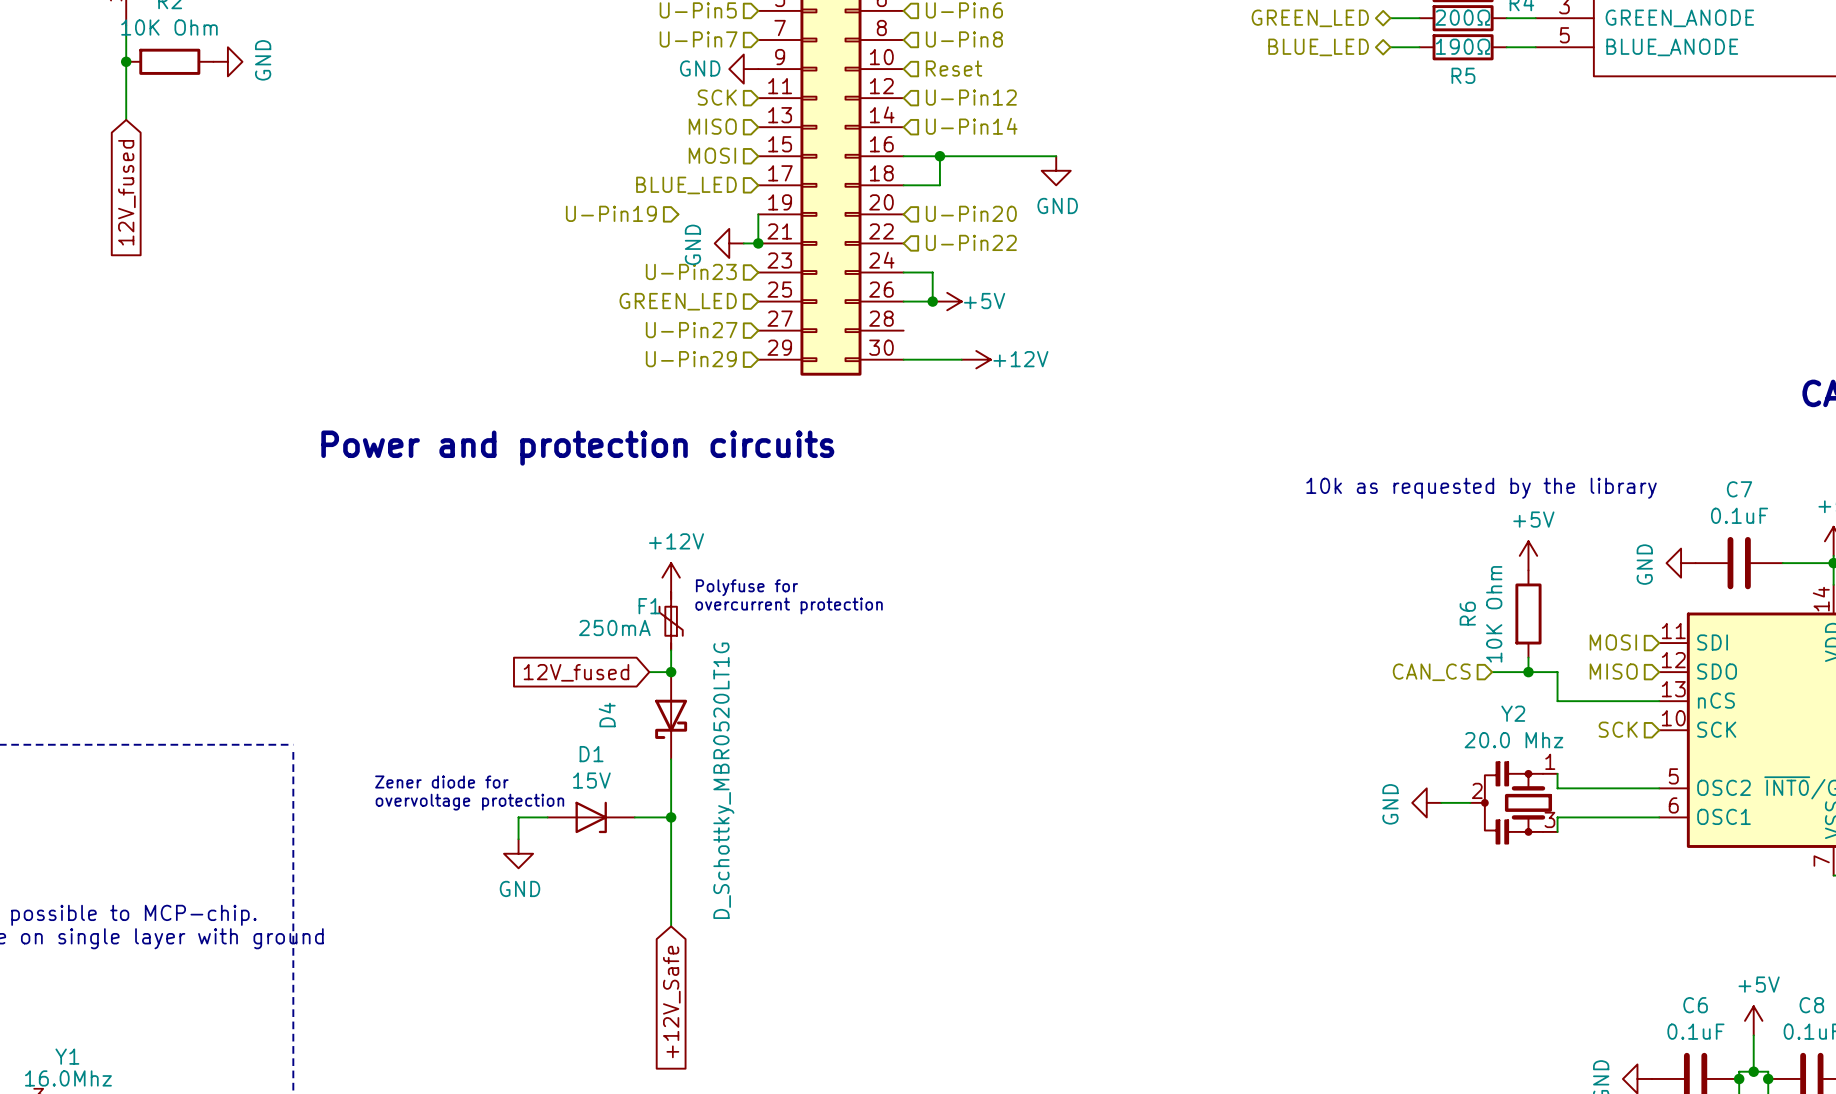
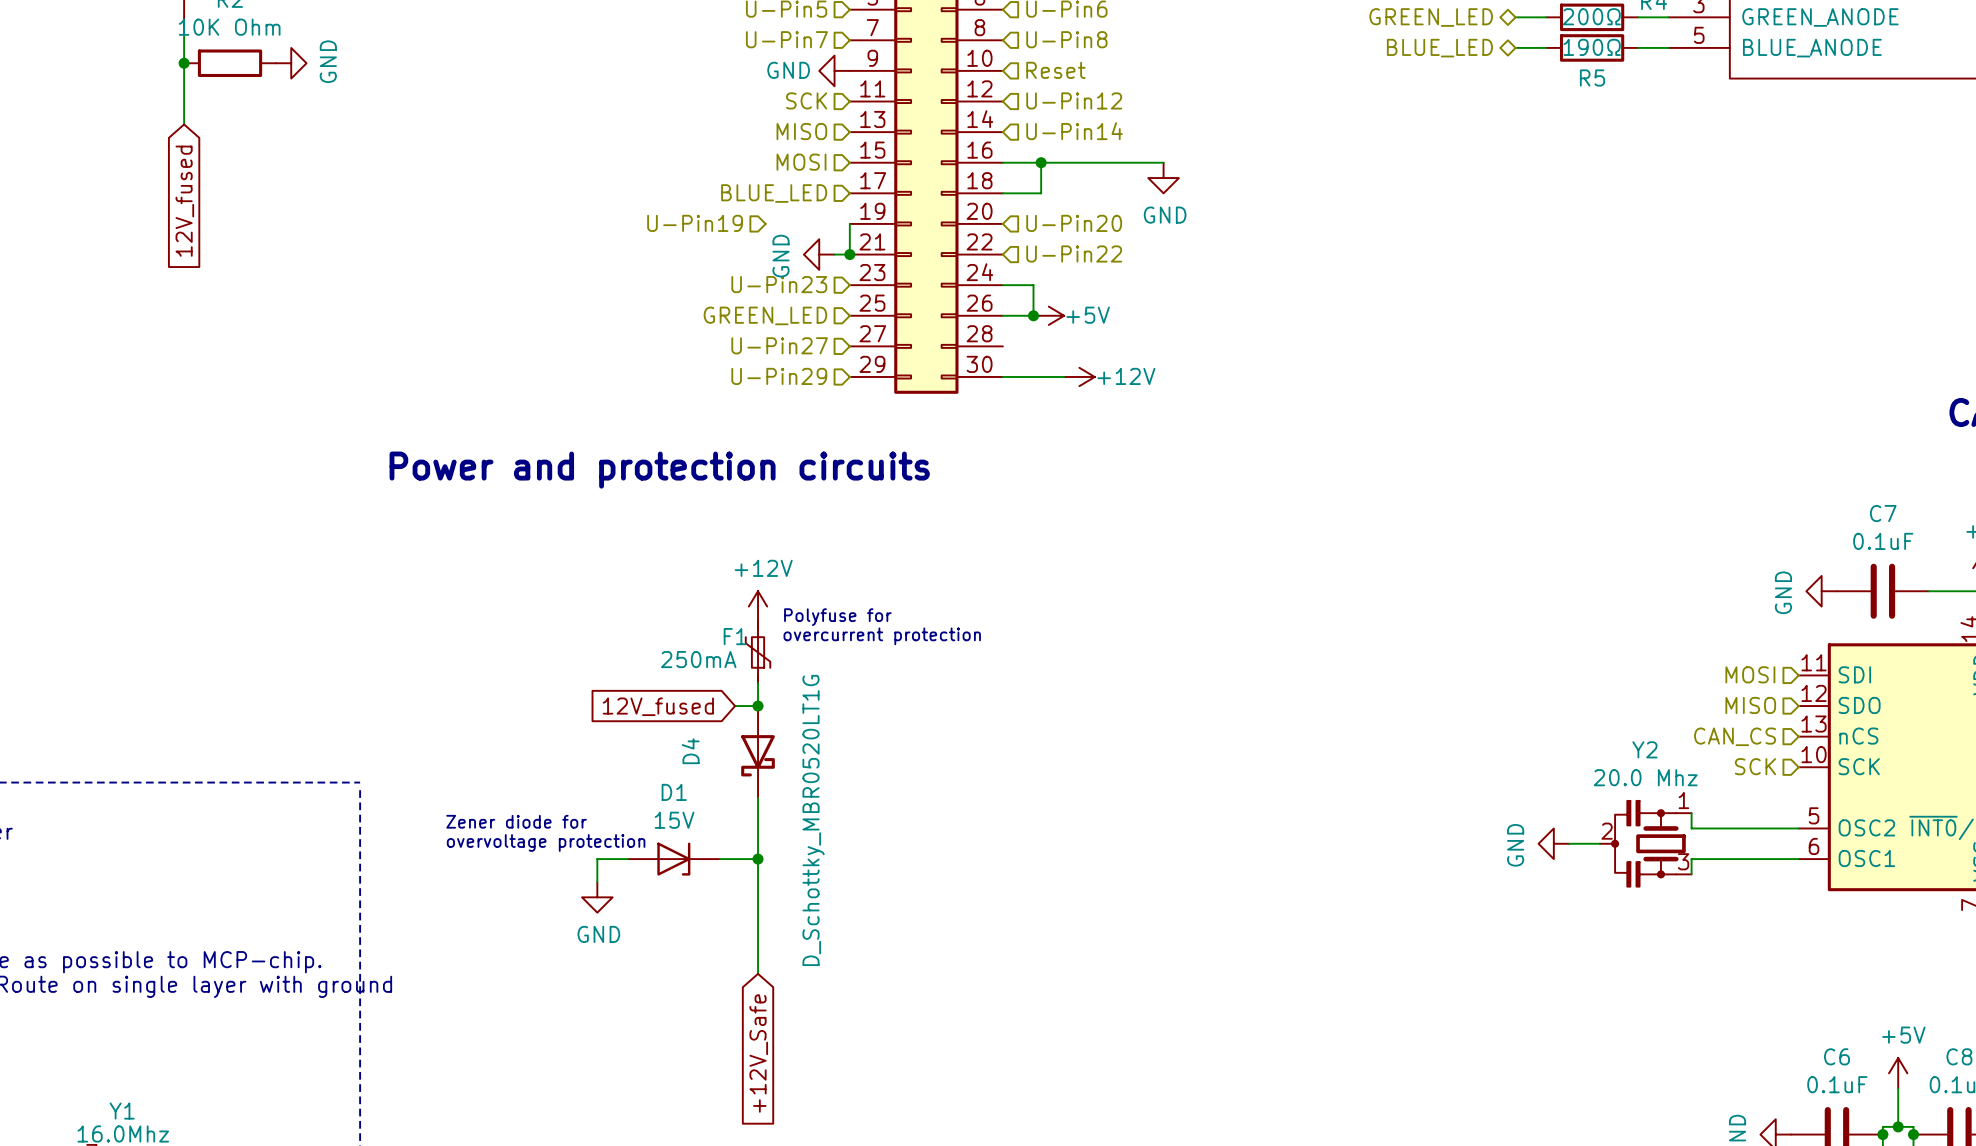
text: 10k as requested by the library (1481, 488) -> none
power symbol: +5V (1528, 555) -> none
R6: 10K Ohm (1528, 613) -> none
wire: (1528, 657) (1528, 672) -> none
hierarchical label position: CAN_CS (1431, 672) -> CAN_CS (1735, 736)
wire: (1492, 672) (1557, 672) (1557, 701) (1659, 701) -> none
junction: (1528, 672) -> none

